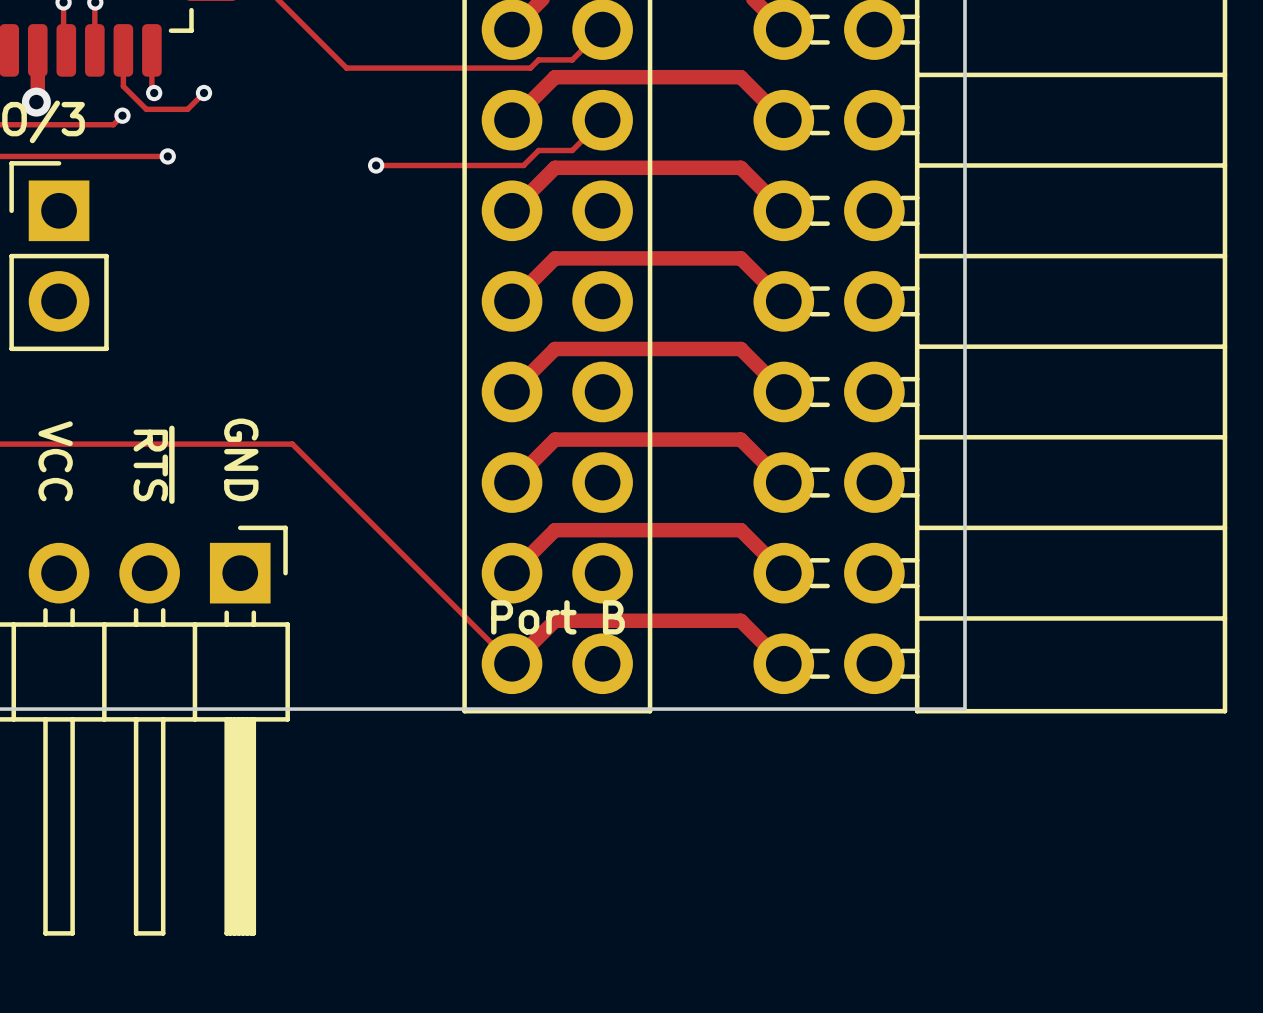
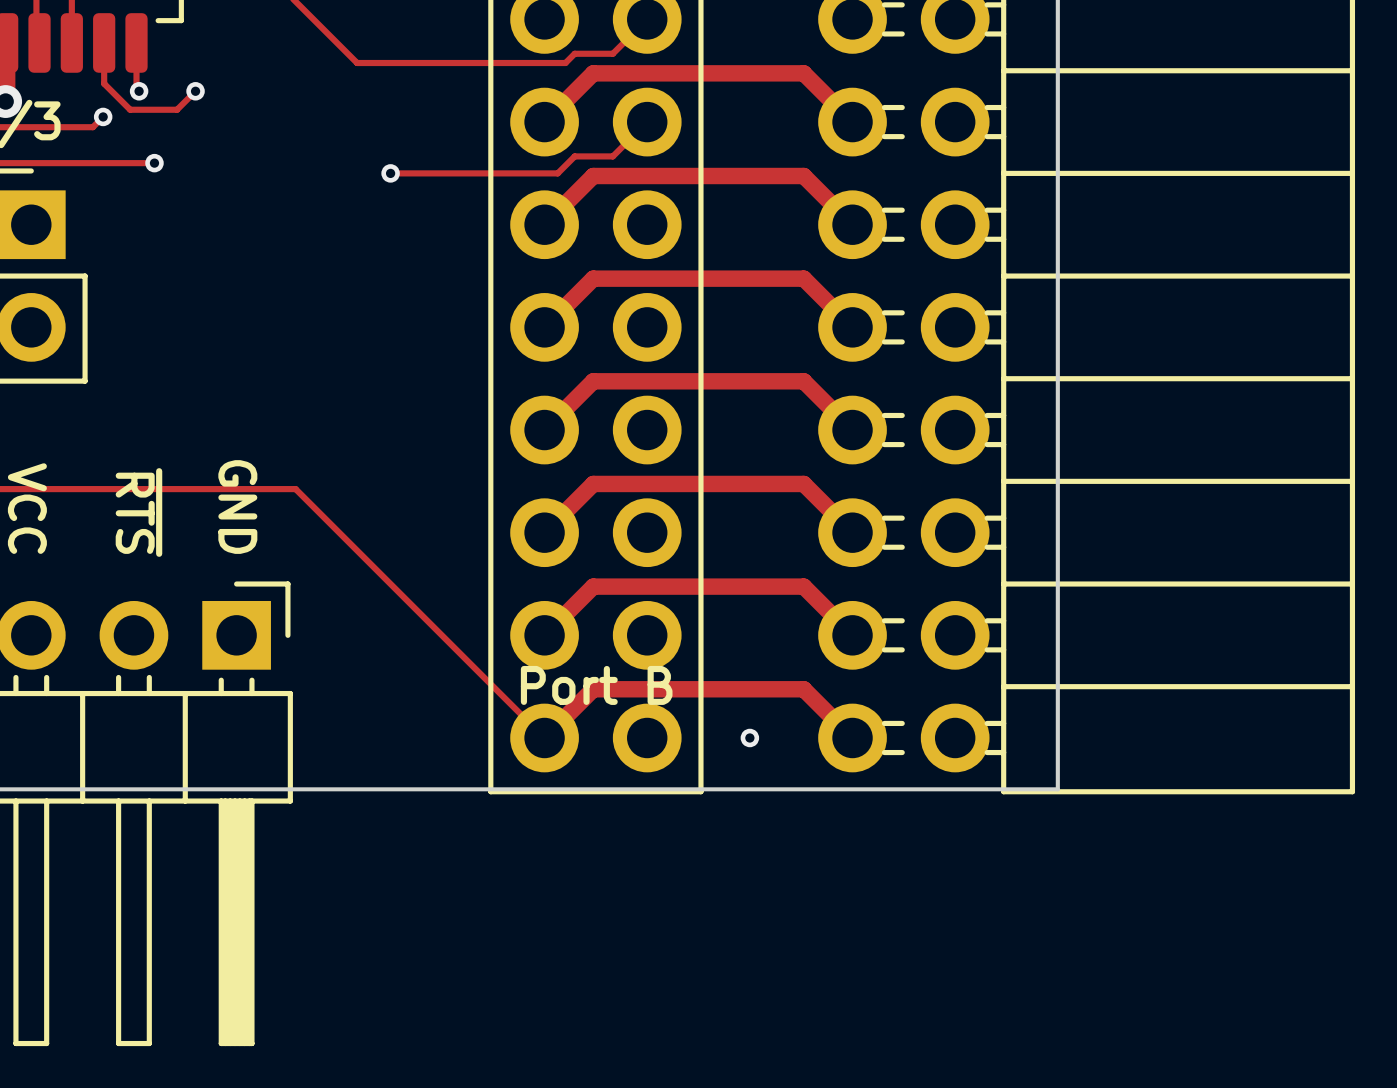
via: none -> (749, 737)

